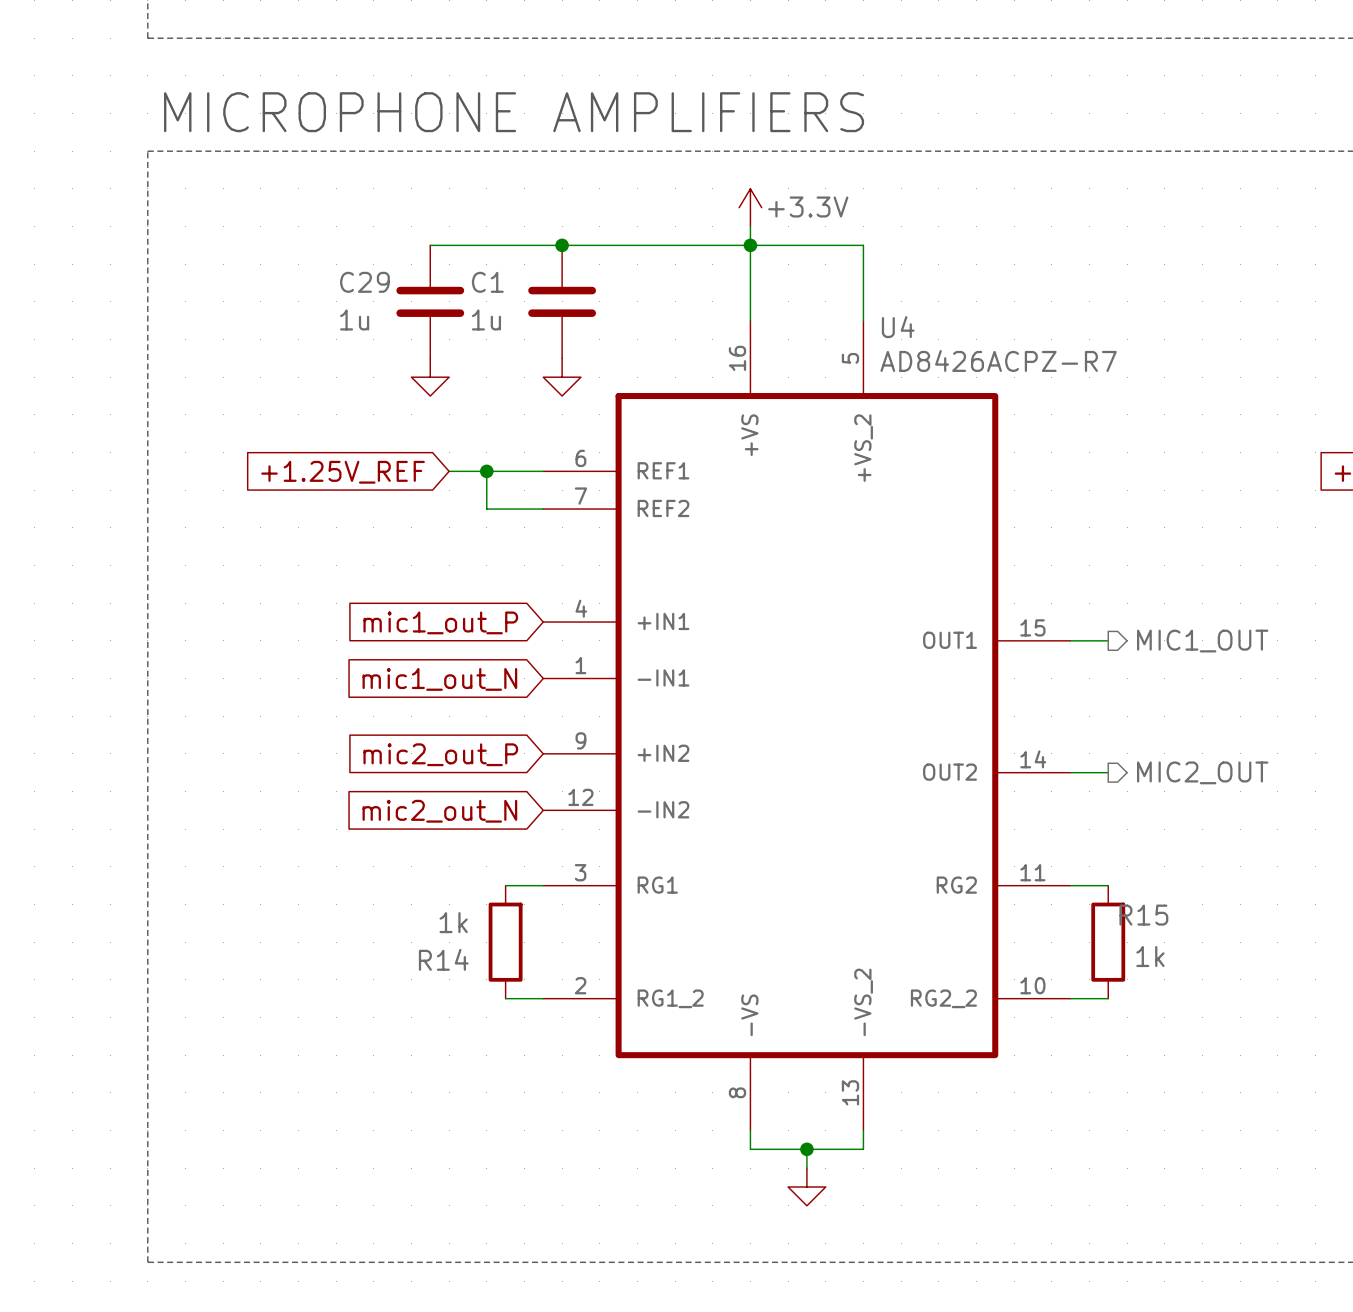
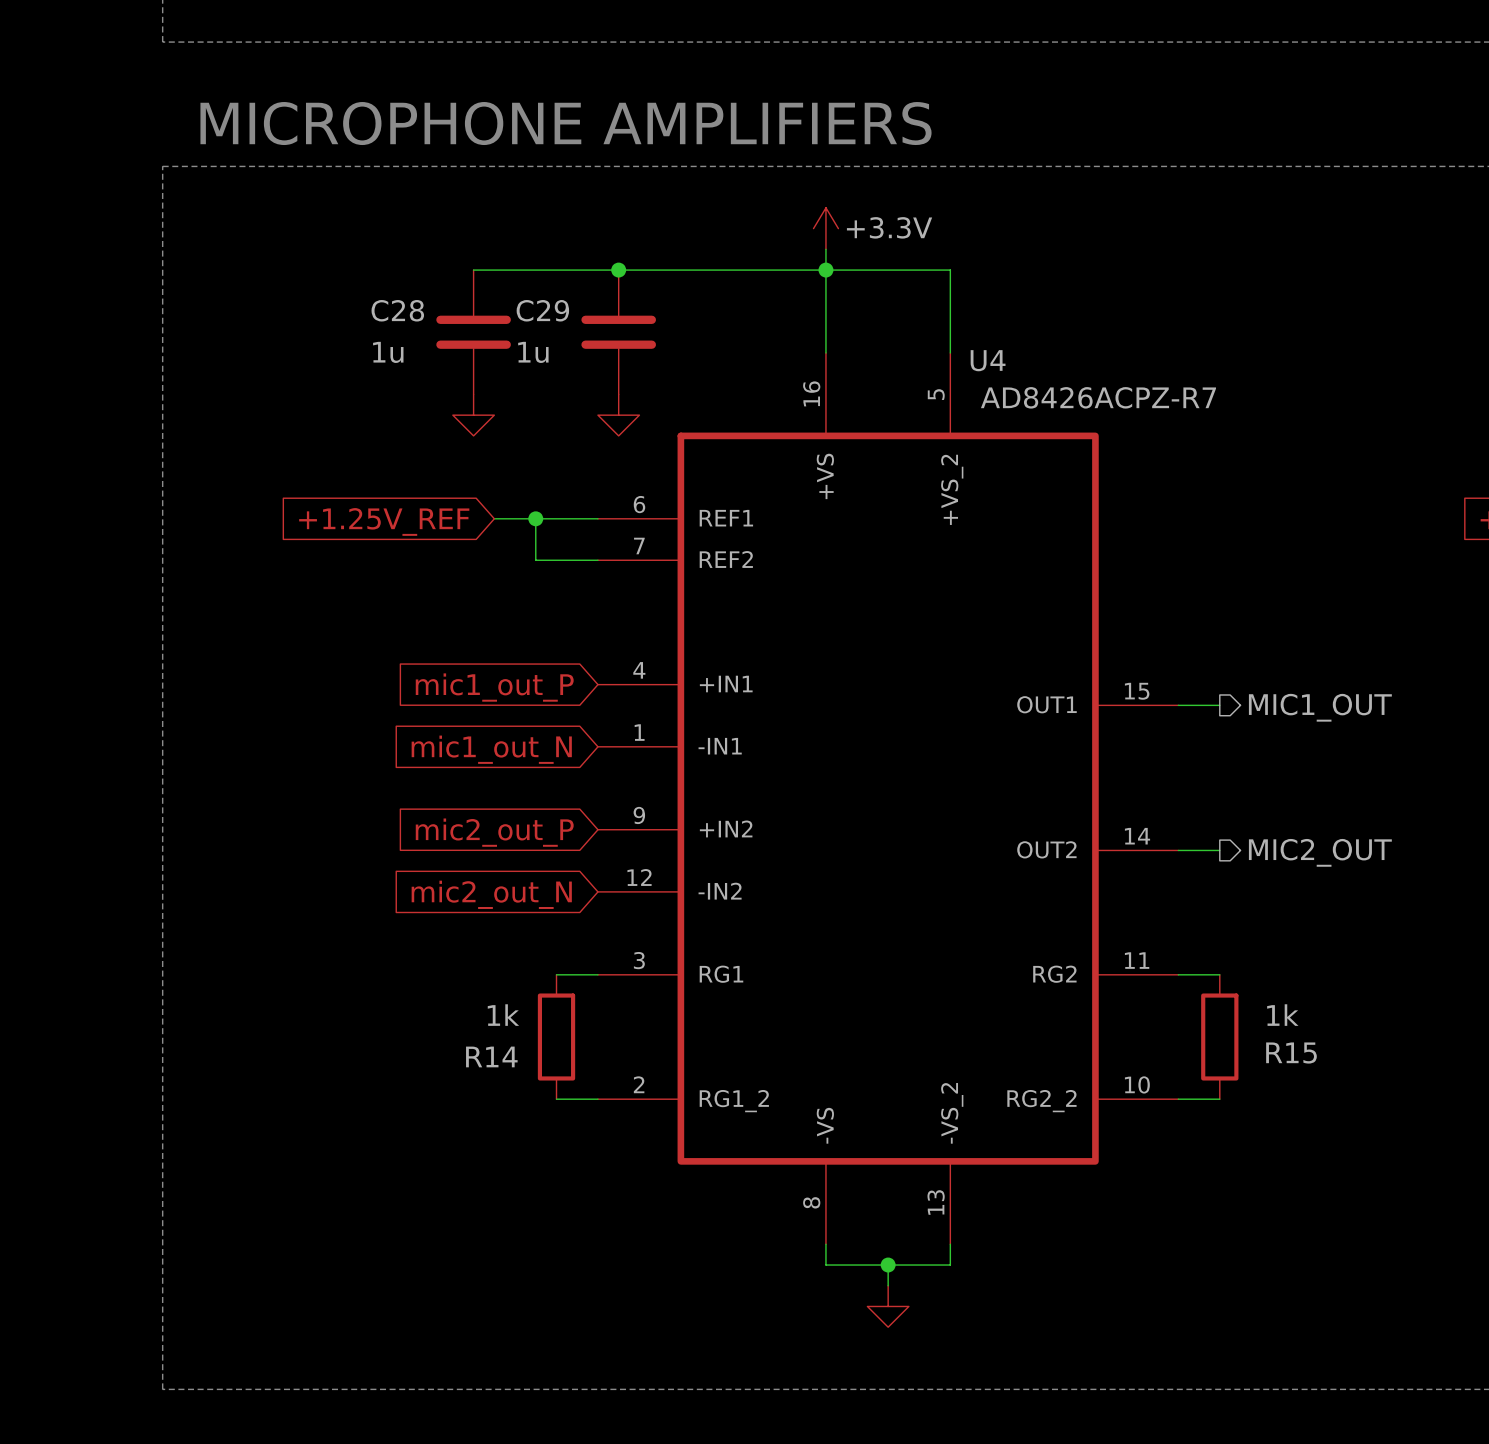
C29 name: C29 (364, 282) -> C28 (397, 310)
C1 name: C1 (487, 282) -> C29 (542, 310)
R15 name position: R15 (1143, 915) -> R15 (1291, 1053)
R15 value position: 1k (1150, 956) -> 1k (1282, 1015)

